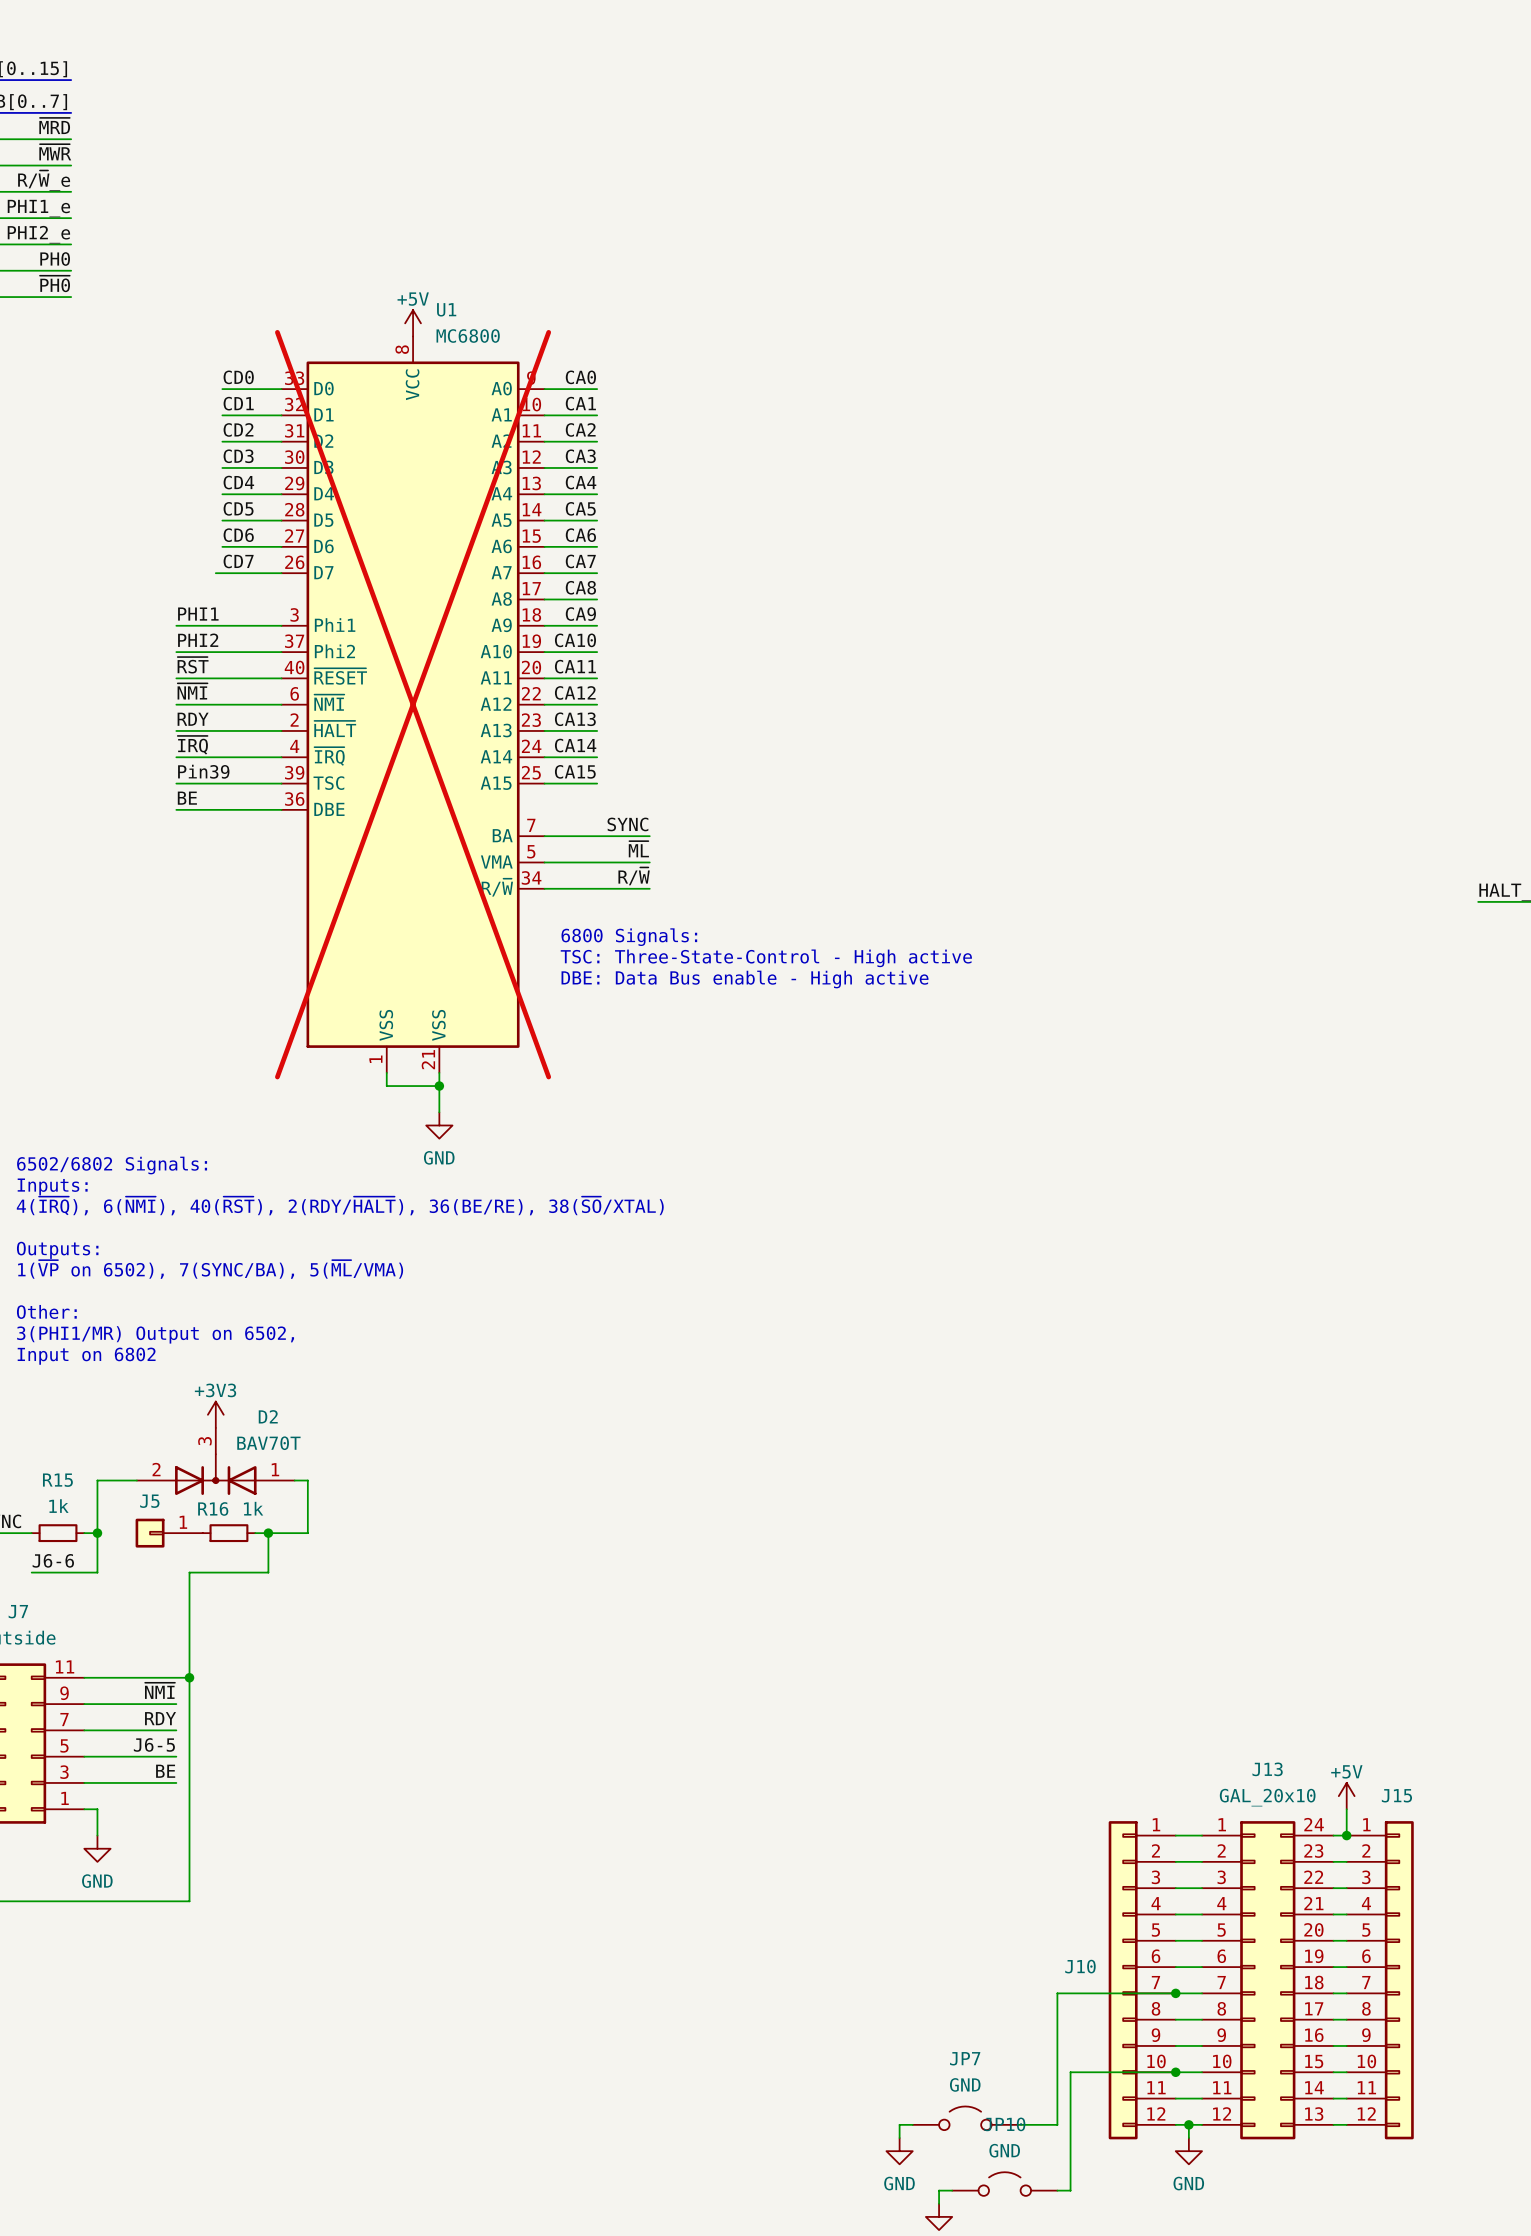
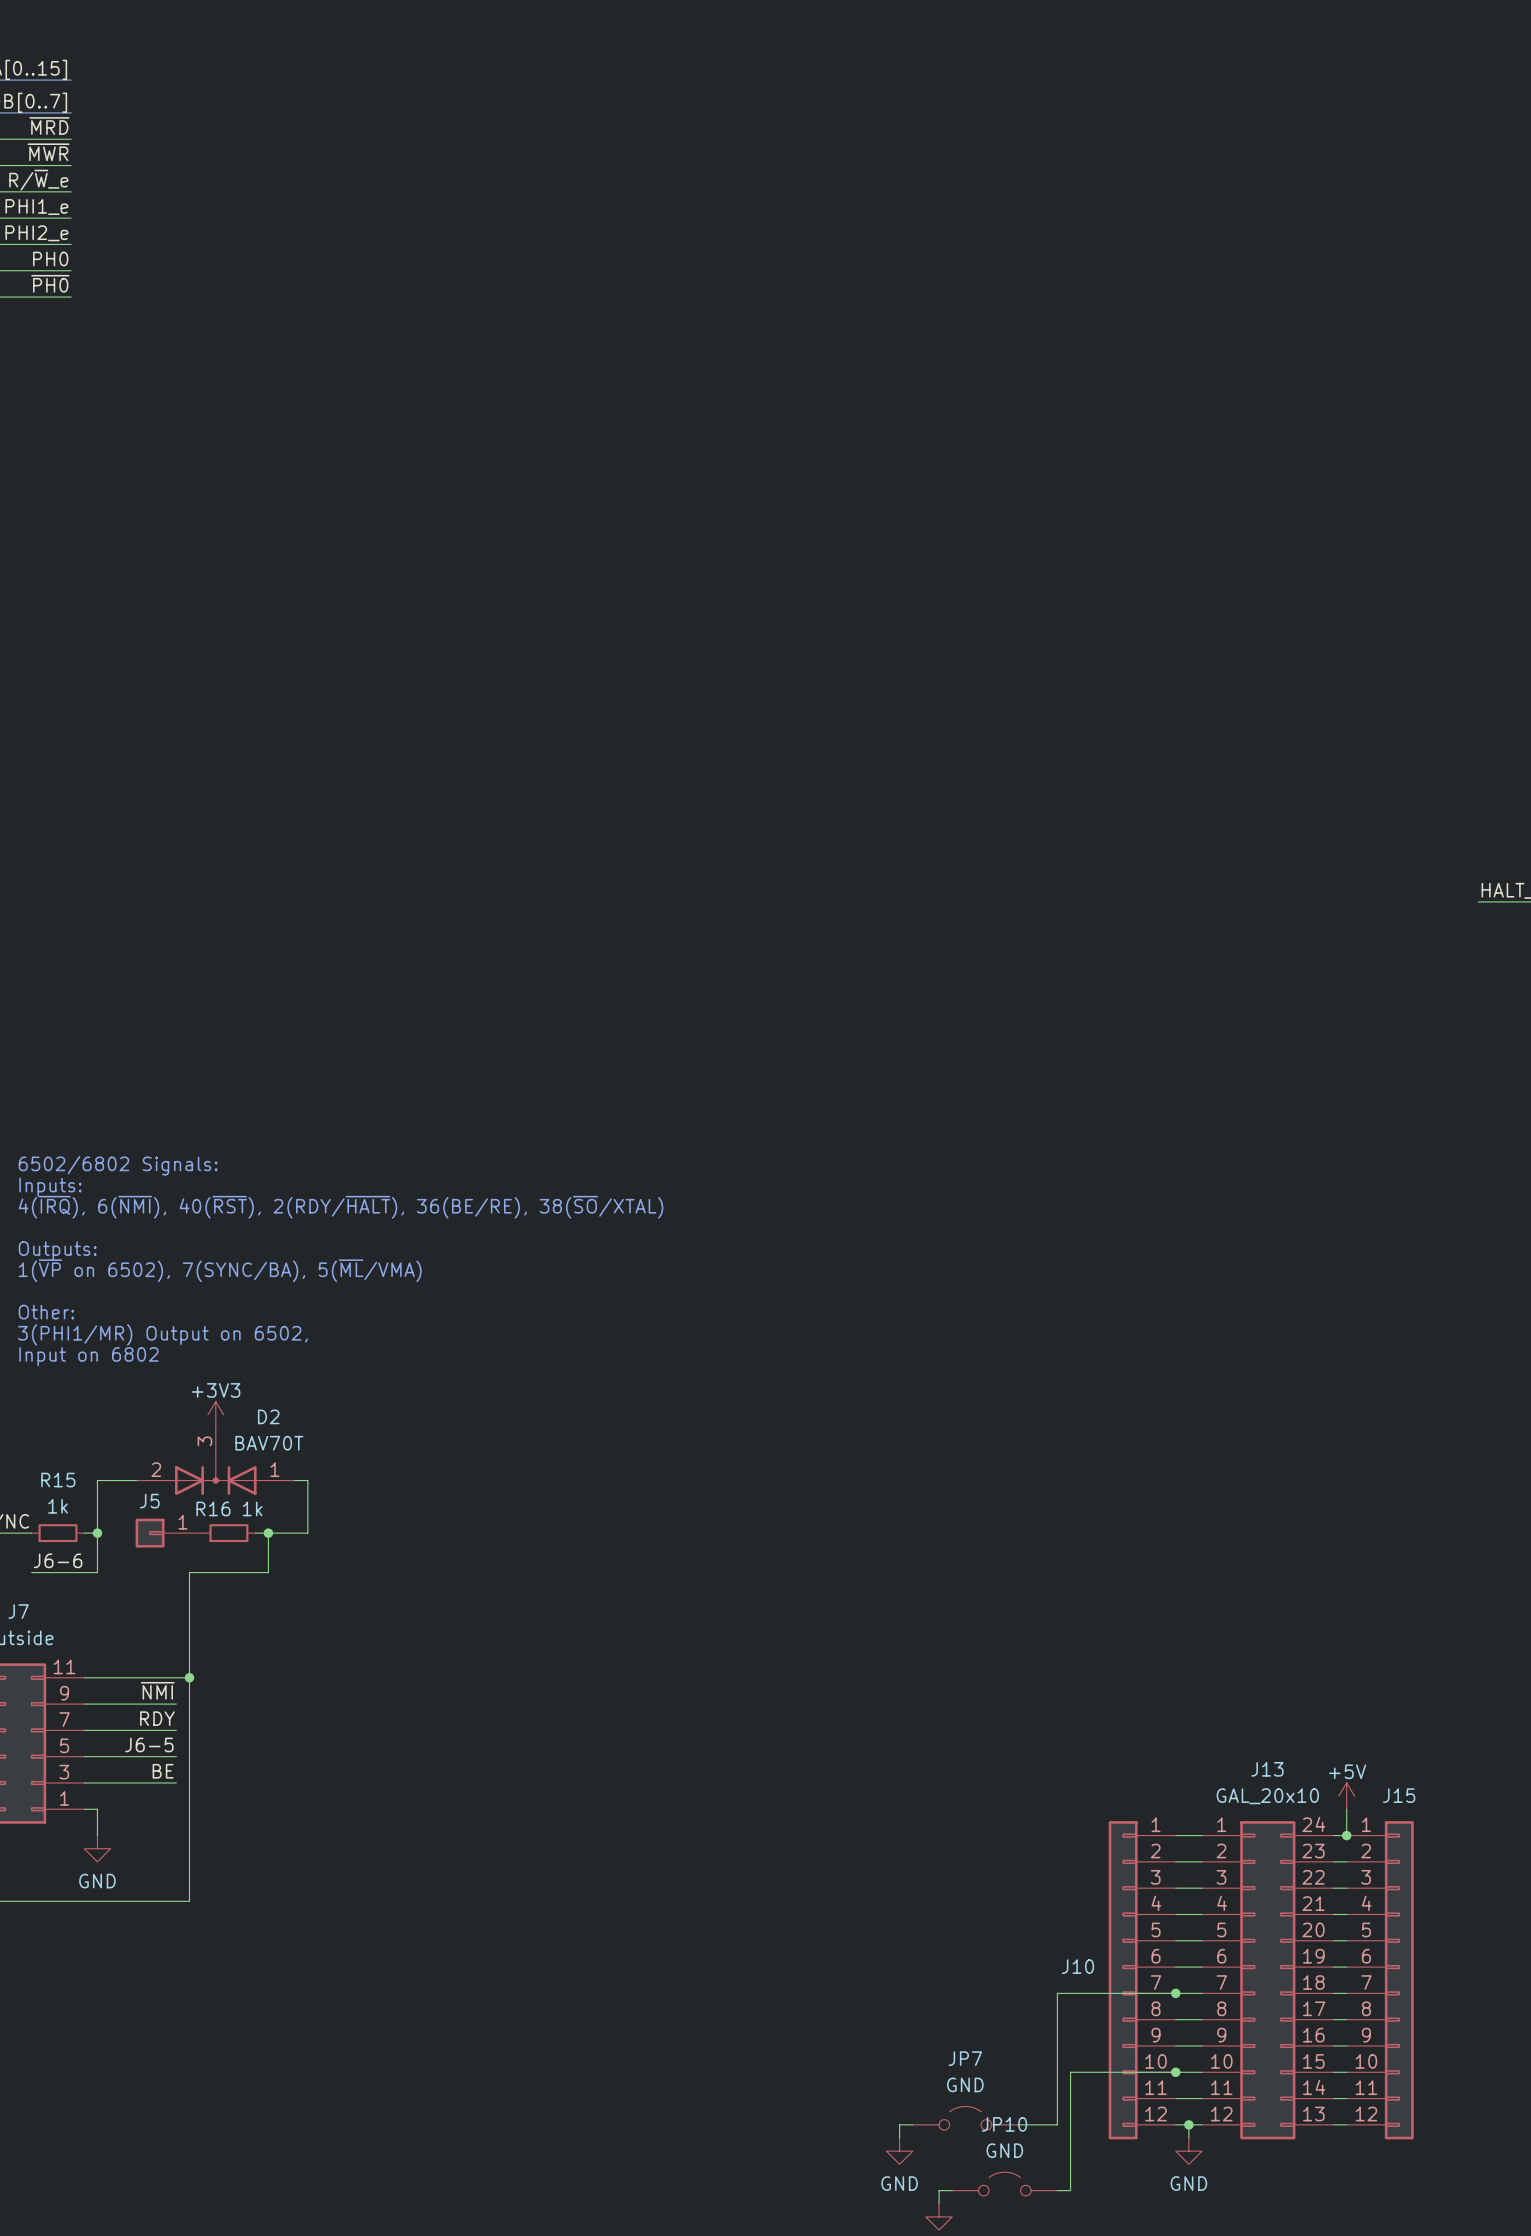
power symbol: +5V (413, 323) -> none
label: CD0 (238, 377) -> none
label: CA0 (580, 377) -> none
wire: (222, 389) (281, 389) -> none
wire: (544, 389) (597, 389) -> none
label: CD1 (238, 403) -> none
label: CA1 (580, 403) -> none
wire: (222, 415) (281, 415) -> none
wire: (544, 415) (597, 415) -> none
label: CD2 (238, 429) -> none
label: CA2 (580, 429) -> none
wire: (222, 441) (281, 441) -> none
wire: (544, 441) (597, 441) -> none
label: CD3 (238, 456) -> none
label: CA3 (580, 456) -> none
wire: (222, 467) (281, 467) -> none
wire: (544, 467) (597, 467) -> none
label: CD4 (238, 482) -> none
label: CA4 (581, 482) -> none
wire: (222, 494) (281, 494) -> none
wire: (544, 494) (597, 494) -> none
label: CD5 (238, 508) -> none
label: CA5 (580, 508) -> none
wire: (222, 520) (281, 520) -> none
wire: (544, 520) (597, 520) -> none
label: CD6 (238, 535) -> none
label: CA6 (580, 535) -> none
wire: (222, 546) (281, 546) -> none
wire: (544, 546) (597, 546) -> none
label: CD7 (238, 561) -> none
label: CA7 (580, 561) -> none
wire: (215, 573) (281, 573) -> none
wire: (544, 573) (597, 573) -> none
label: CA8 (580, 587) -> none
wire: (544, 599) (597, 599) -> none
label: PHI1 (198, 614) -> none
label: CA9 (580, 614) -> none
wire: (176, 625) (281, 625) -> none
wire: (544, 625) (597, 625) -> none
label: PHI2 (198, 640) -> none
label: CA10 (575, 640) -> none
wire: (176, 652) (281, 652) -> none
wire: (544, 652) (597, 652) -> none
label: ~{RST} (193, 665) -> none
label: CA11 (575, 666) -> none
wire: (176, 678) (281, 678) -> none
wire: (544, 678) (597, 678) -> none
label: ~{NMI} (192, 691) -> none
label: CA12 (575, 692) -> none
wire: (176, 704) (281, 704) -> none
U1: MC6800 (413, 704) -> none
wire: (544, 704) (597, 704) -> none
label: RDY (193, 719) -> none
label: CA13 (575, 719) -> none
wire: (176, 730) (281, 730) -> none
wire: (544, 730) (597, 730) -> none
label: ~{IRQ} (192, 745) -> none
label: CA14 (575, 745) -> none
wire: (176, 757) (281, 757) -> none
wire: (544, 757) (597, 757) -> none
label: Pin39 (203, 771) -> none
label: CA15 (575, 771) -> none
wire: (176, 783) (281, 783) -> none
wire: (544, 783) (597, 783) -> none
label: BE (187, 798) -> none
wire: (176, 809) (281, 809) -> none
label: SYNC (627, 824) -> none
wire: (544, 836) (649, 836) -> none
label: ~{ML} (638, 849) -> none
wire: (544, 862) (649, 862) -> none
label: R/~{W} (634, 876) -> none
wire: (544, 888) (649, 888) -> none
text: 6800 Signals: (629, 937) -> none
text: TSC: Three-State-Control - High active (766, 958) -> none
text: DBE: Data Bus enable - High active (745, 979) -> none
wire: (386, 1072) (386, 1086) (439, 1086) -> none
wire: (439, 1072) (439, 1112) -> none
junction: (439, 1086) -> none
power symbol: GND (439, 1125) -> none

